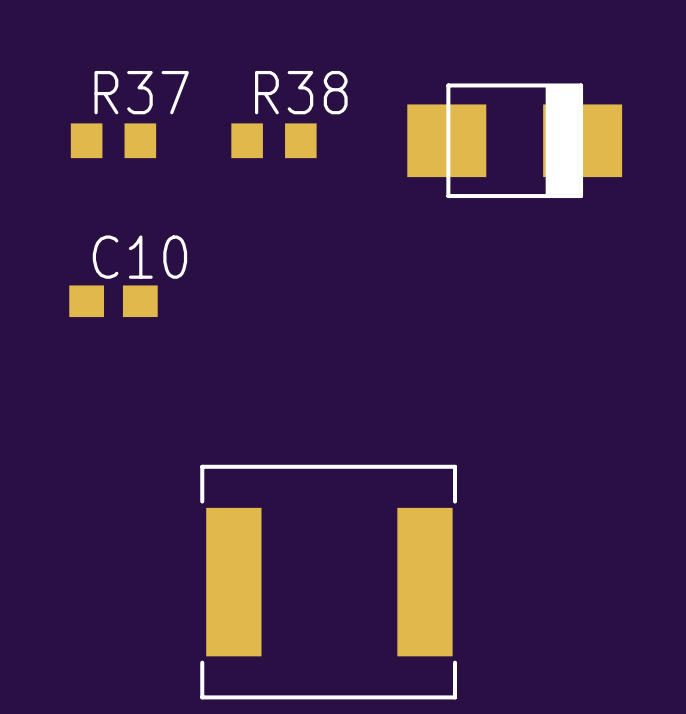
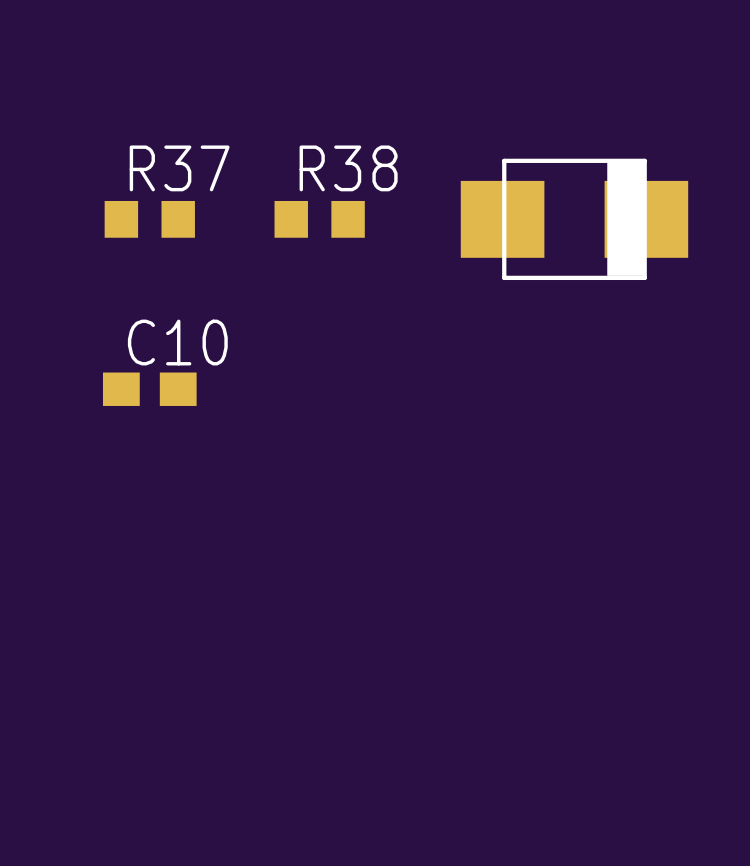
part: (328, 582) -> none

